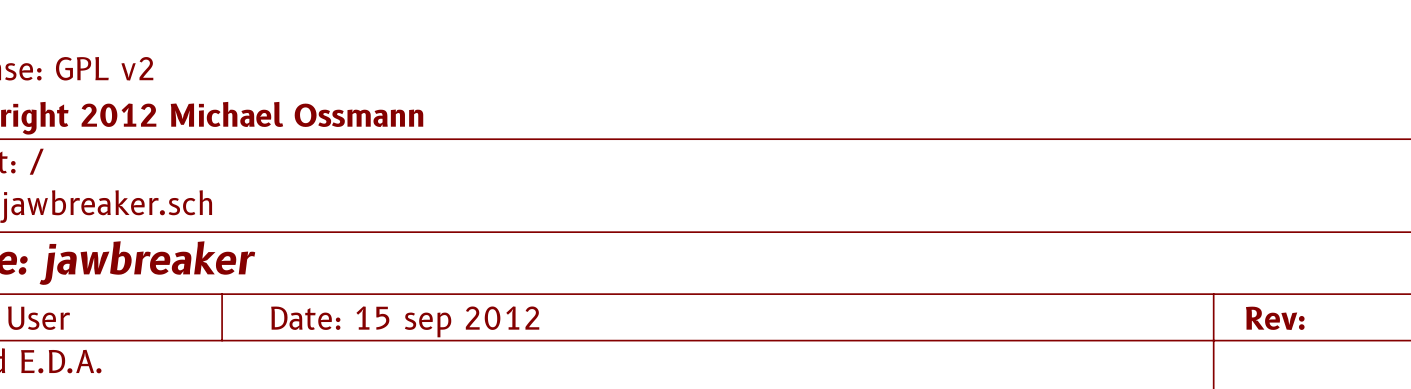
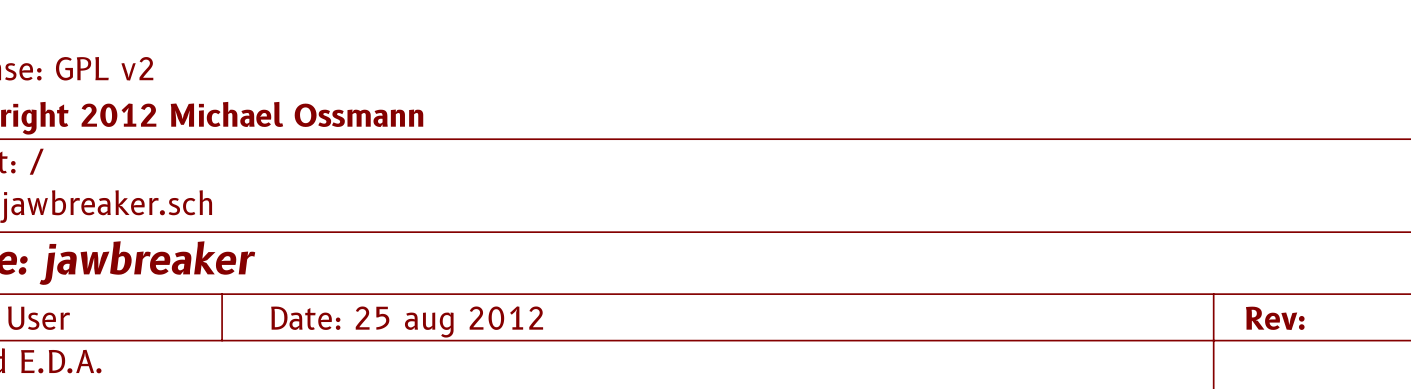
title block: Date: 15 sep 2012 (405, 321) -> Date: 25 aug 2012 (407, 322)

